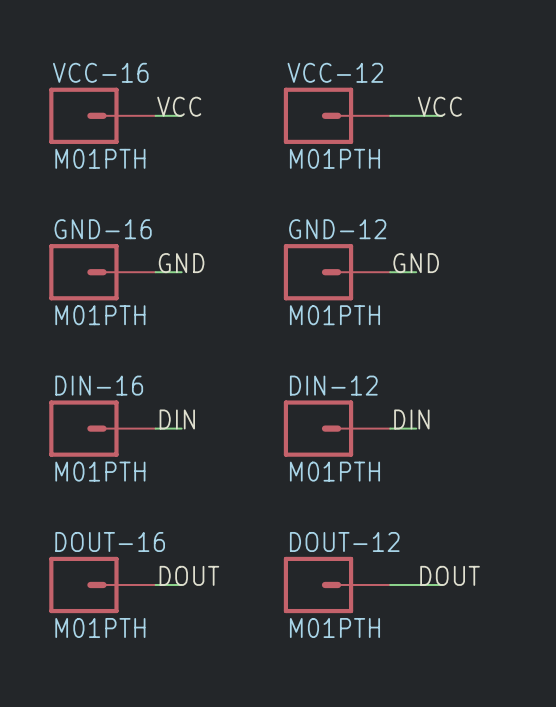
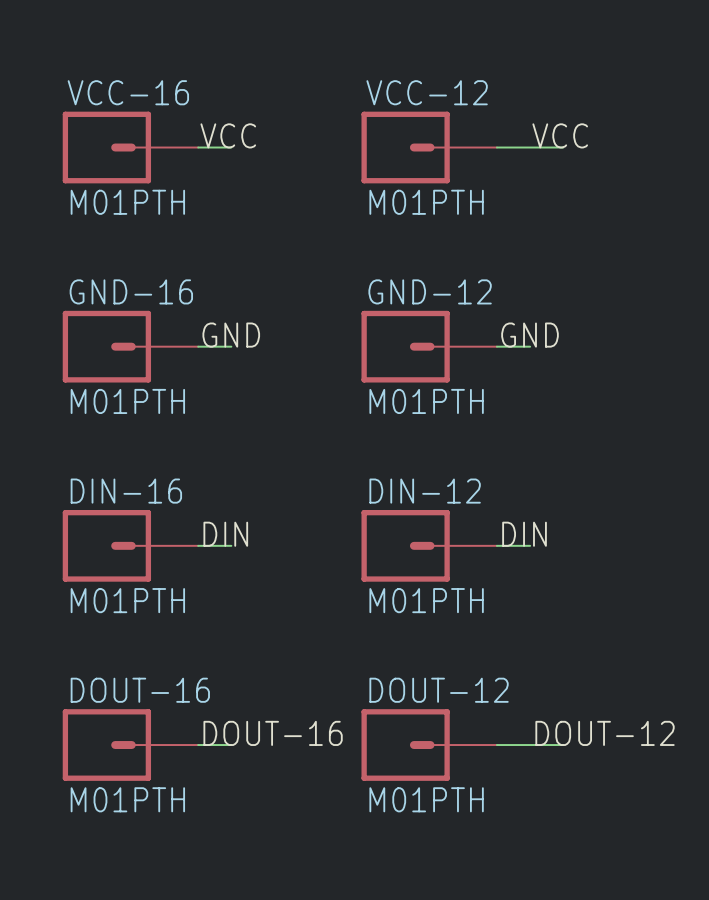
label: DOUT (189, 575) -> DOUT-16 (273, 733)
label: DOUT (450, 575) -> DOUT-12 (605, 733)

